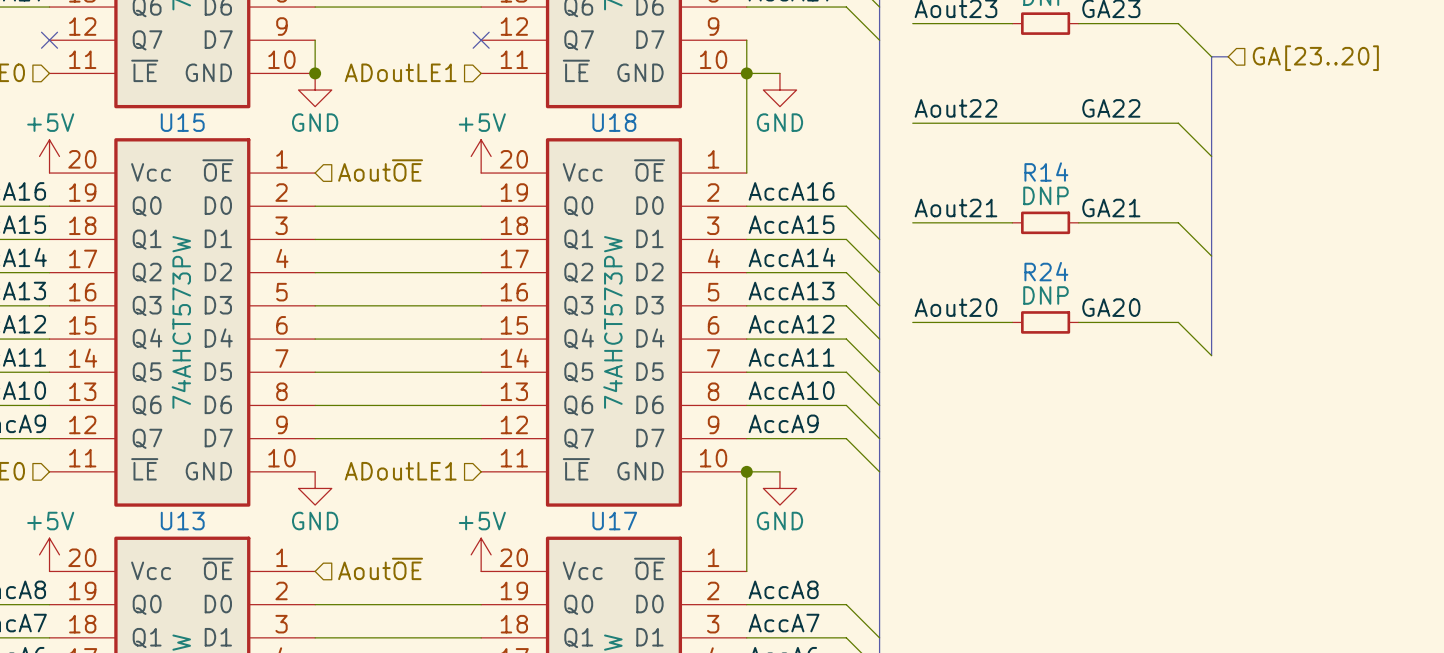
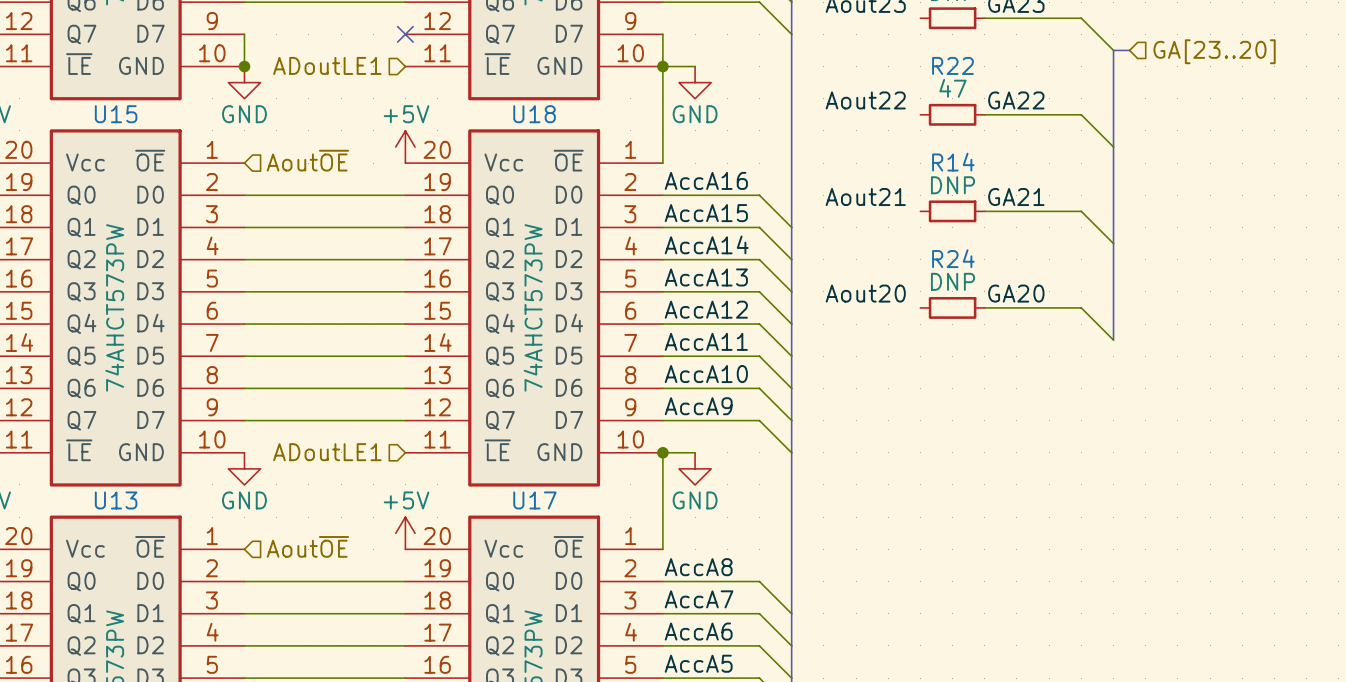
wire: (912, 23) (1012, 23) -> none
wire: (912, 123) (1078, 123) -> none
R22: none -> 47 (952, 114)
wire: (912, 222) (1012, 222) -> none
wire: (912, 322) (1012, 322) -> none

